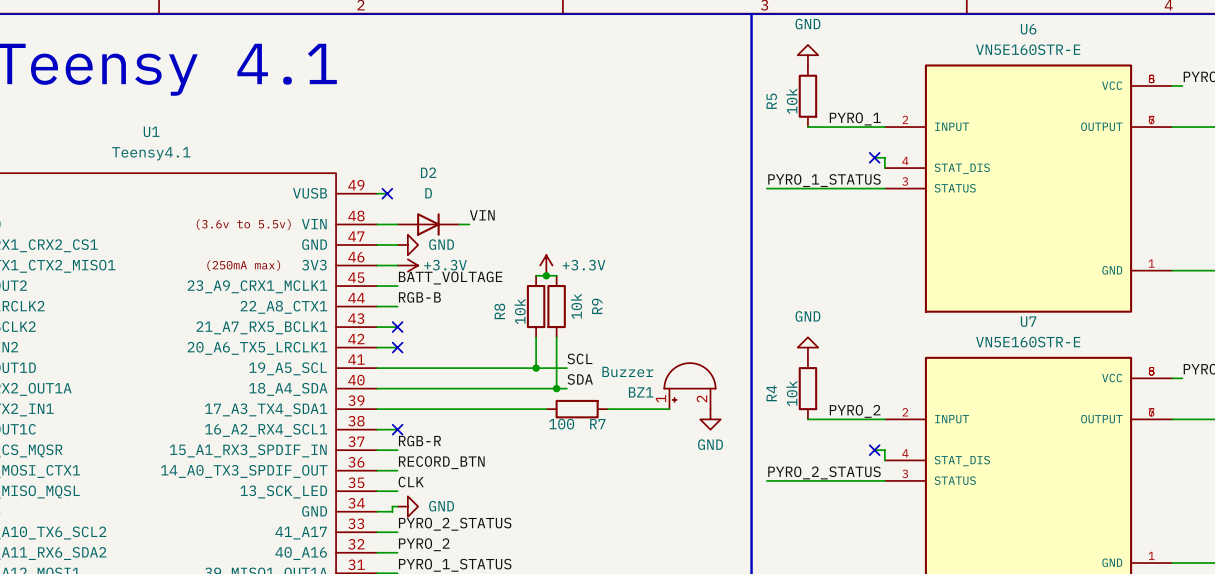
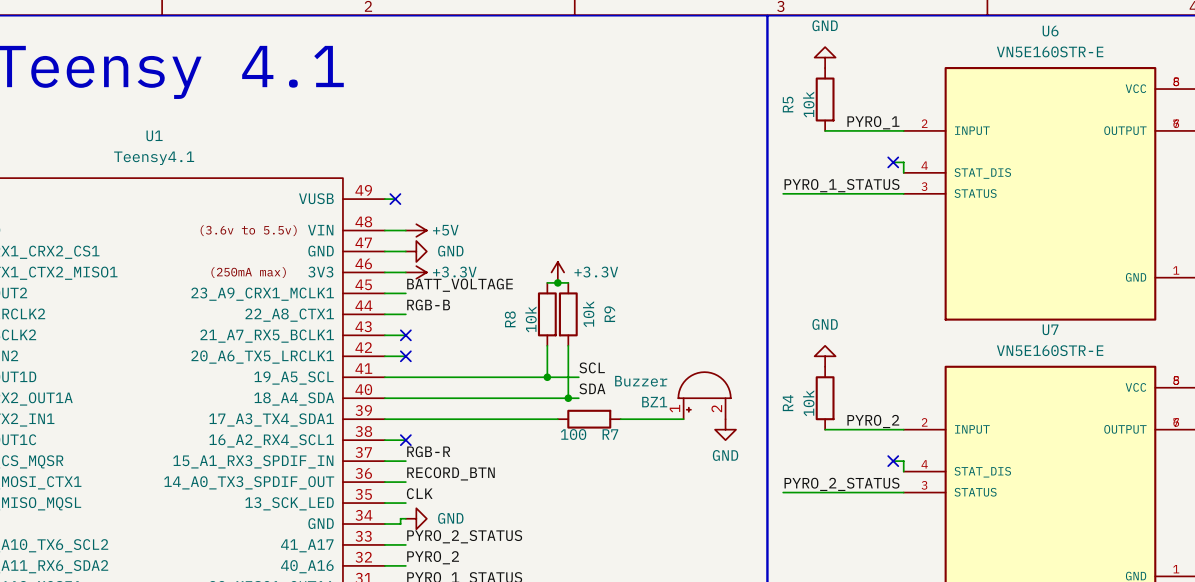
label: VIN (482, 215) -> none
power symbol: none -> +5V (416, 230)
D2: D (428, 224) -> none
wire: (459, 224) (469, 224) -> none

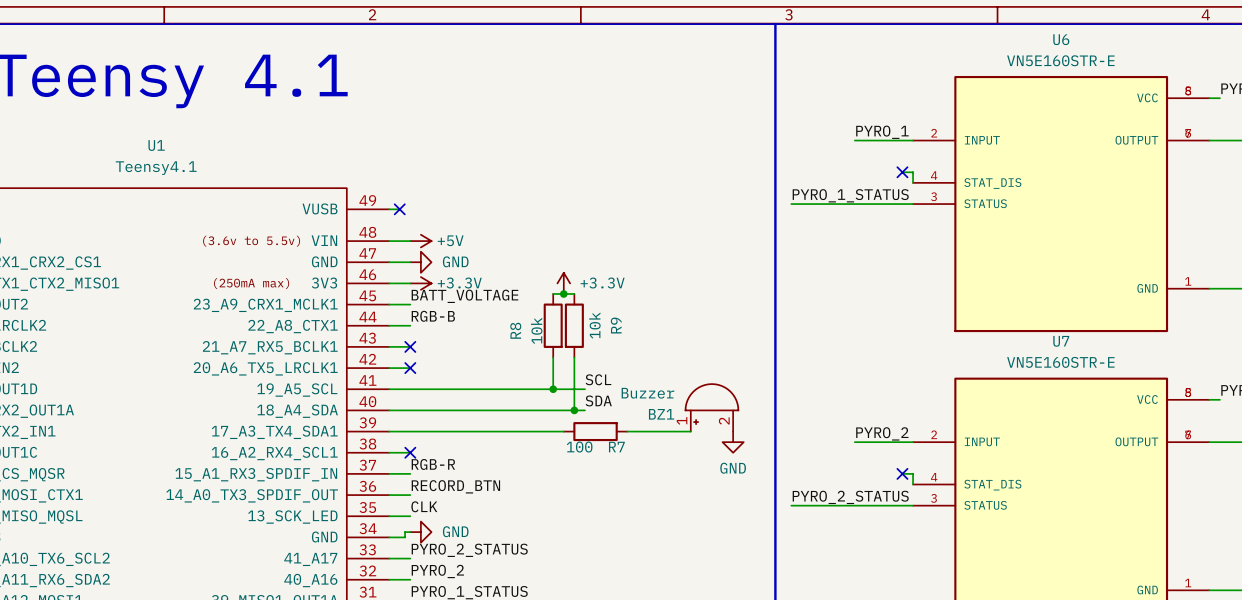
power symbol: GND (825, 57) -> none
R5: 10k (825, 99) -> none
wire: (825, 130) (846, 130) -> none
power symbol: GND (825, 356) -> none
R4: 10k (825, 398) -> none
wire: (825, 429) (846, 429) -> none

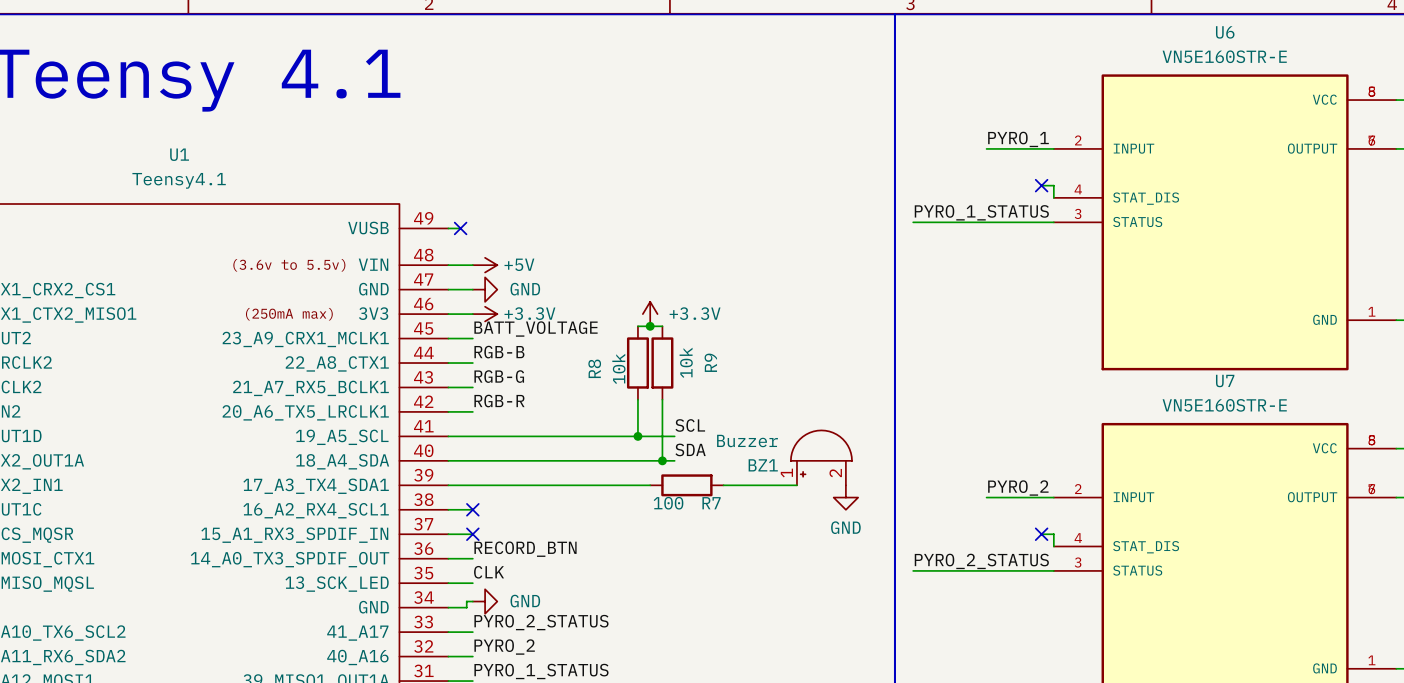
label: none -> RGB-G (499, 376)
no-connect mark: (410, 346) -> none
no-connect mark: (410, 368) -> none
label position: RGB-R (433, 464) -> RGB-R (499, 401)
no-connect mark: none -> (472, 534)

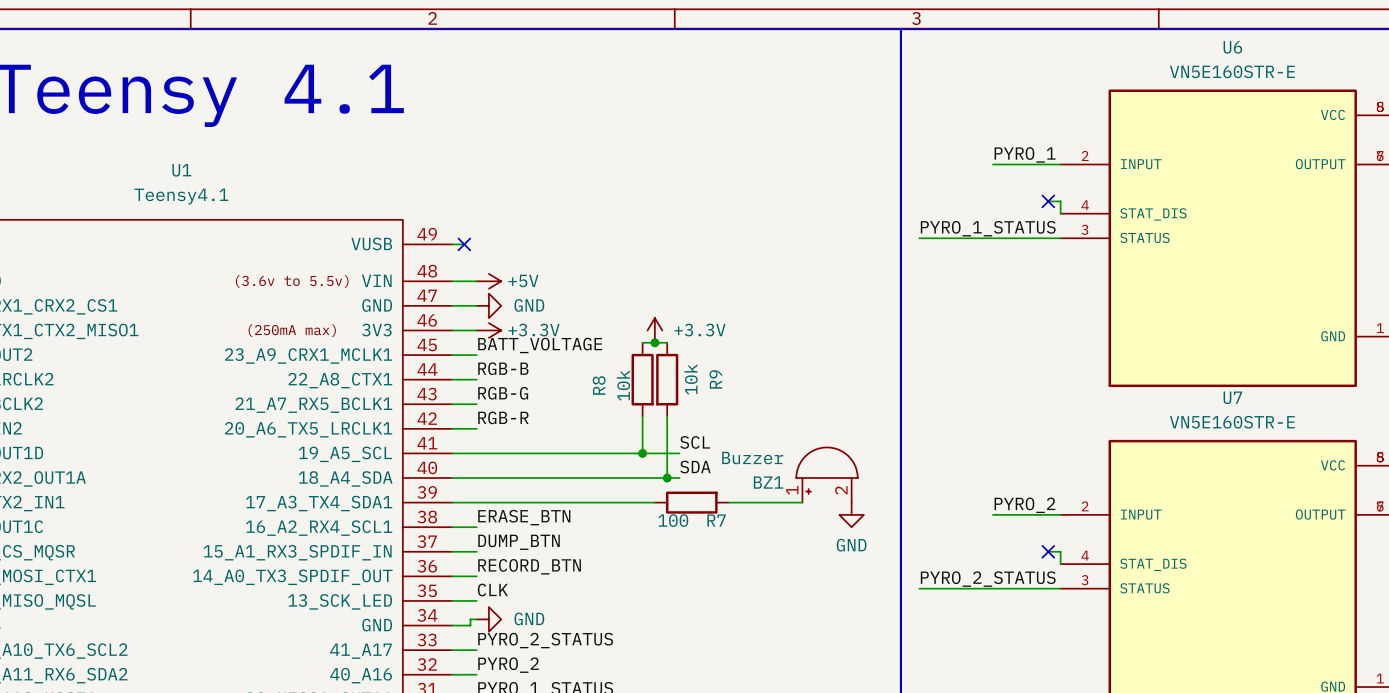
label: none -> ERASE_BTN (524, 517)
no-connect mark: (472, 509) -> none
label: none -> DUMP_BTN (519, 542)
no-connect mark: (472, 534) -> none

